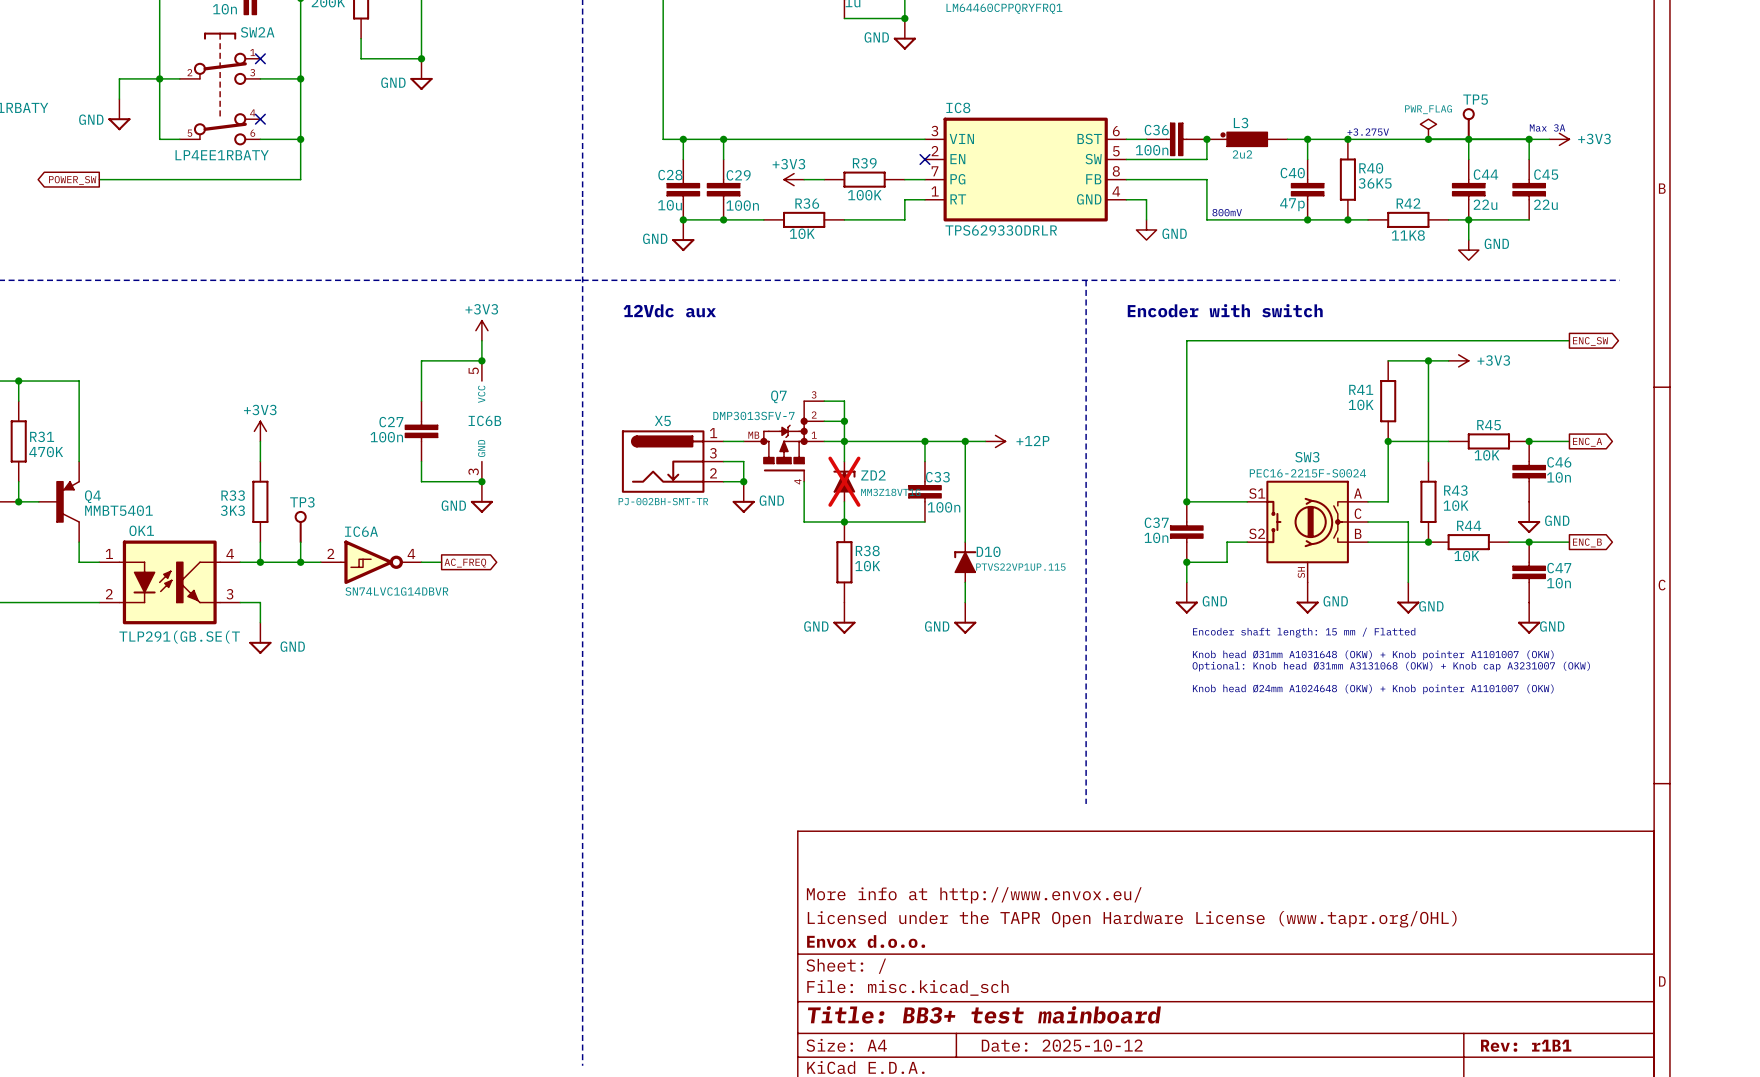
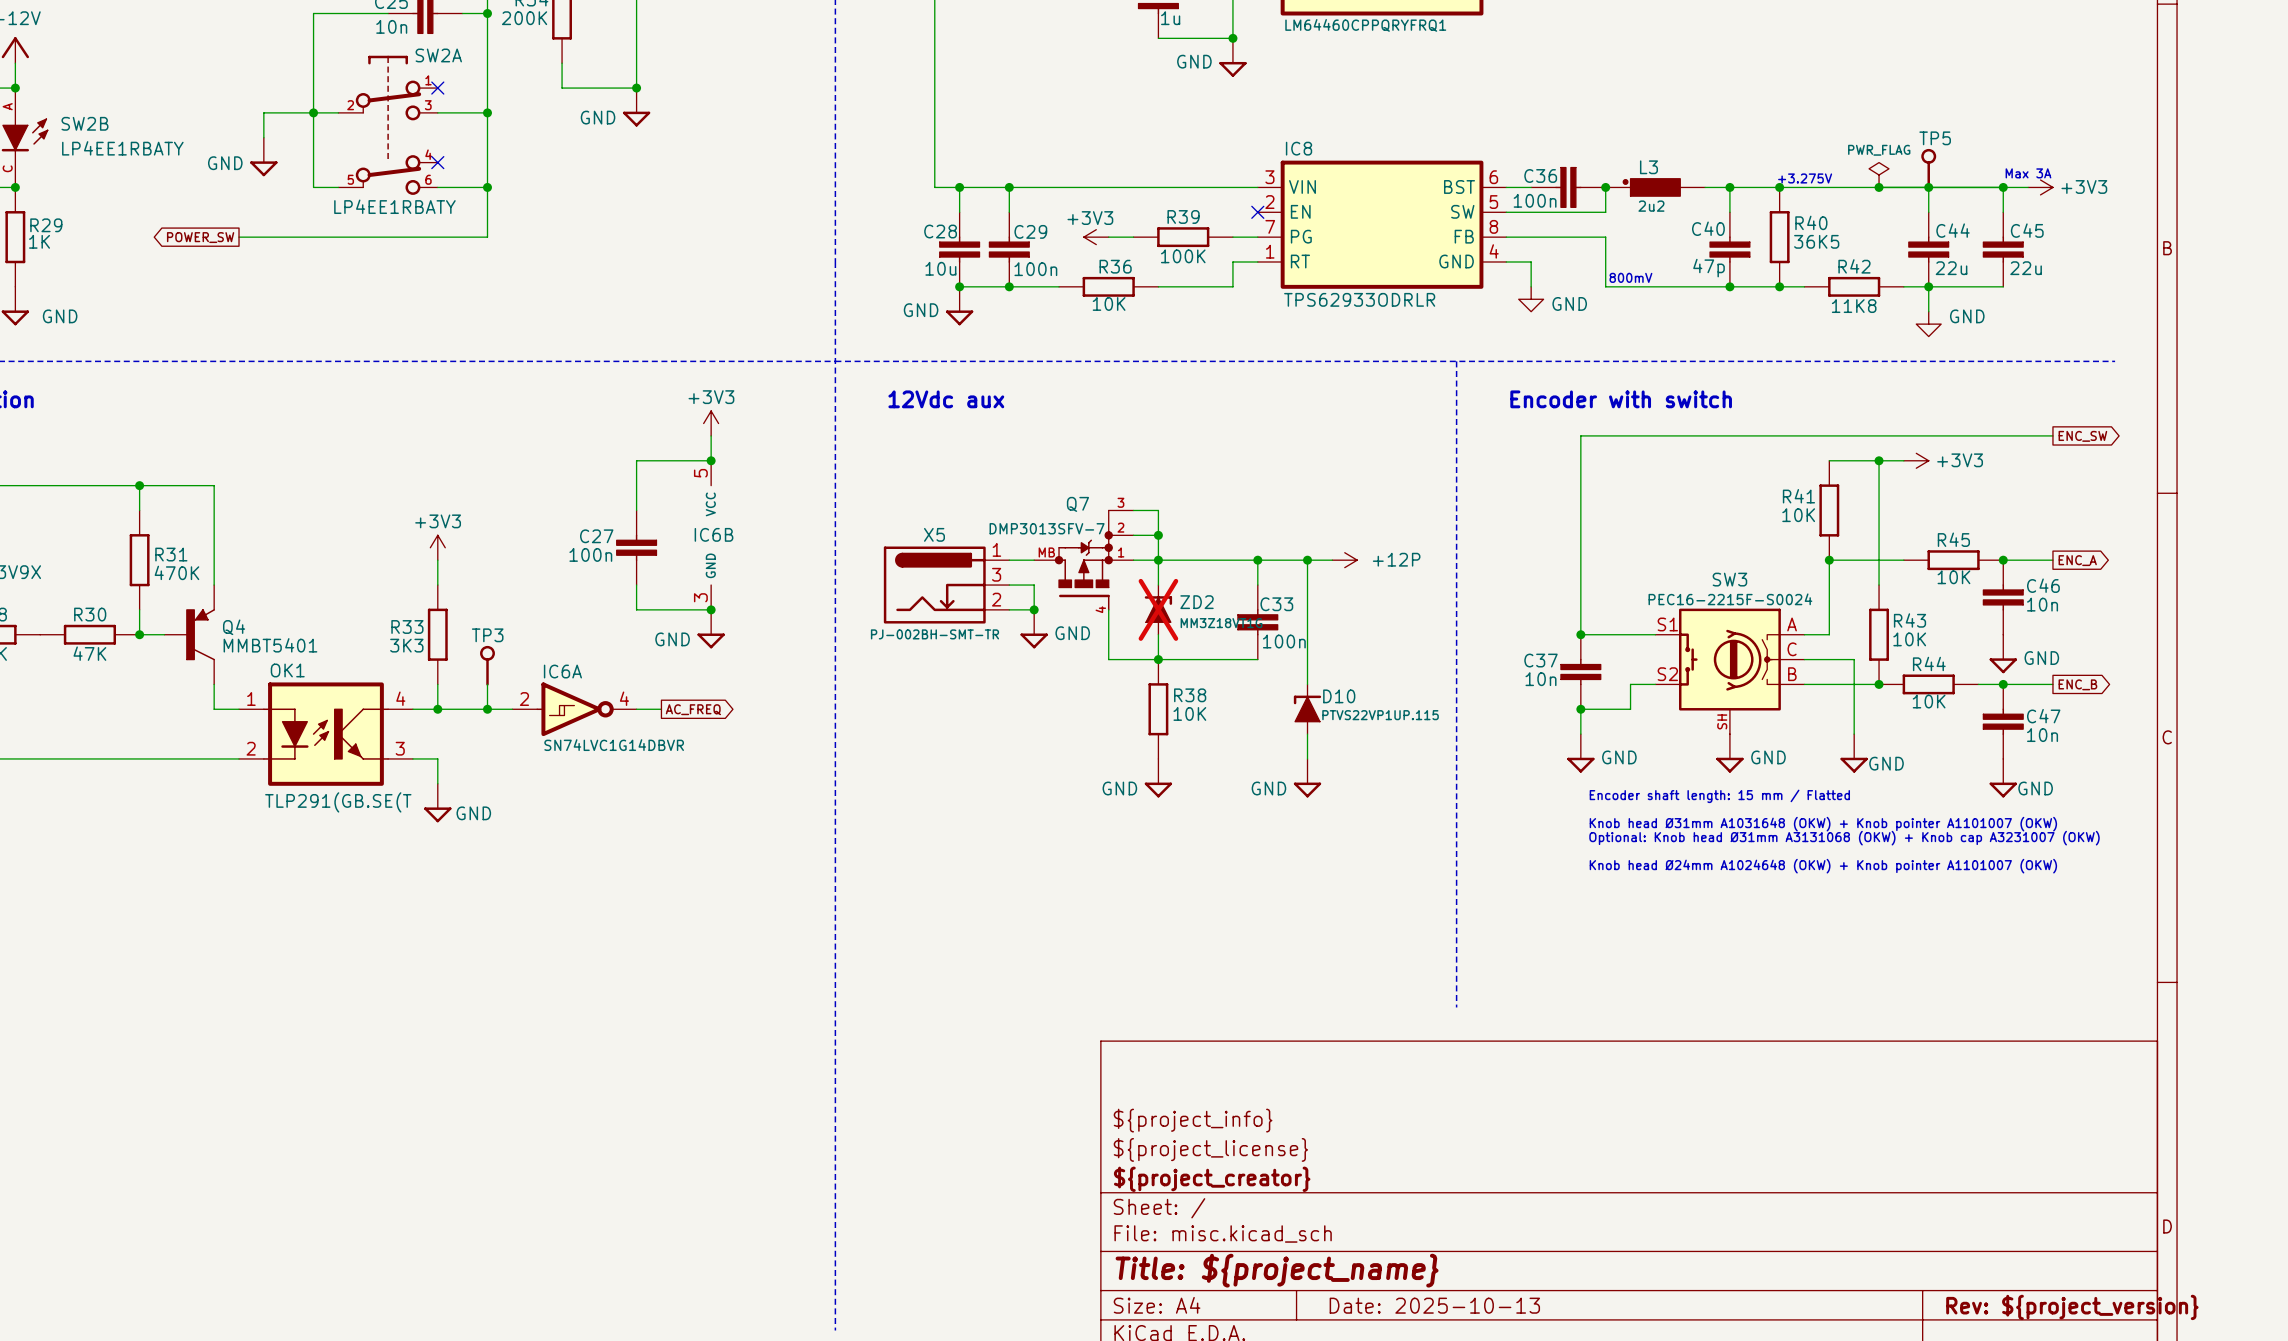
title block: More info at http://www.envox.eu/ (974, 895) -> ${project_info} (1193, 1120)
title block: Licensed under the TAPR Open Hardware License (www.tapr.org/OHL) (1132, 919) -> ${project_license} (1210, 1149)
title block: Envox d.o.o. (866, 941) -> ${project_creator} (1212, 1179)
title block: Title: BB3+ test mainboard (984, 1014) -> Title: ${project_name} (1277, 1270)
title block: Date: 2025-10-12 (1062, 1045) -> Date: 2025-10-13 (1434, 1305)
title block: Rev: r1B1 (1526, 1045) -> Rev: ${project_version} (2072, 1307)

